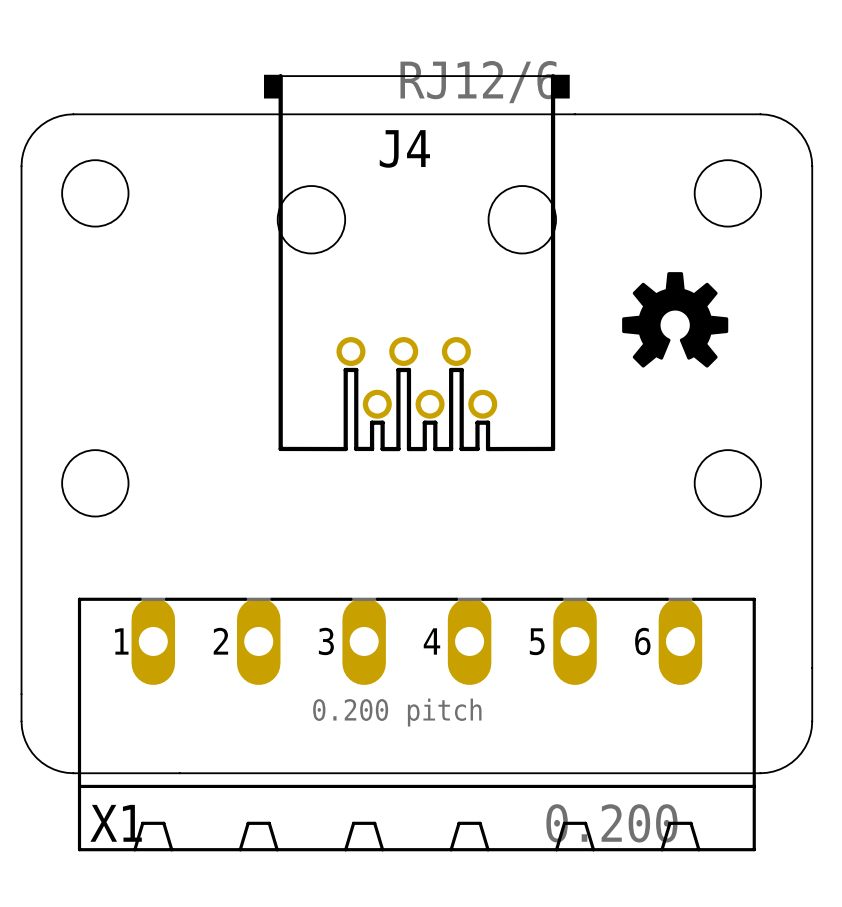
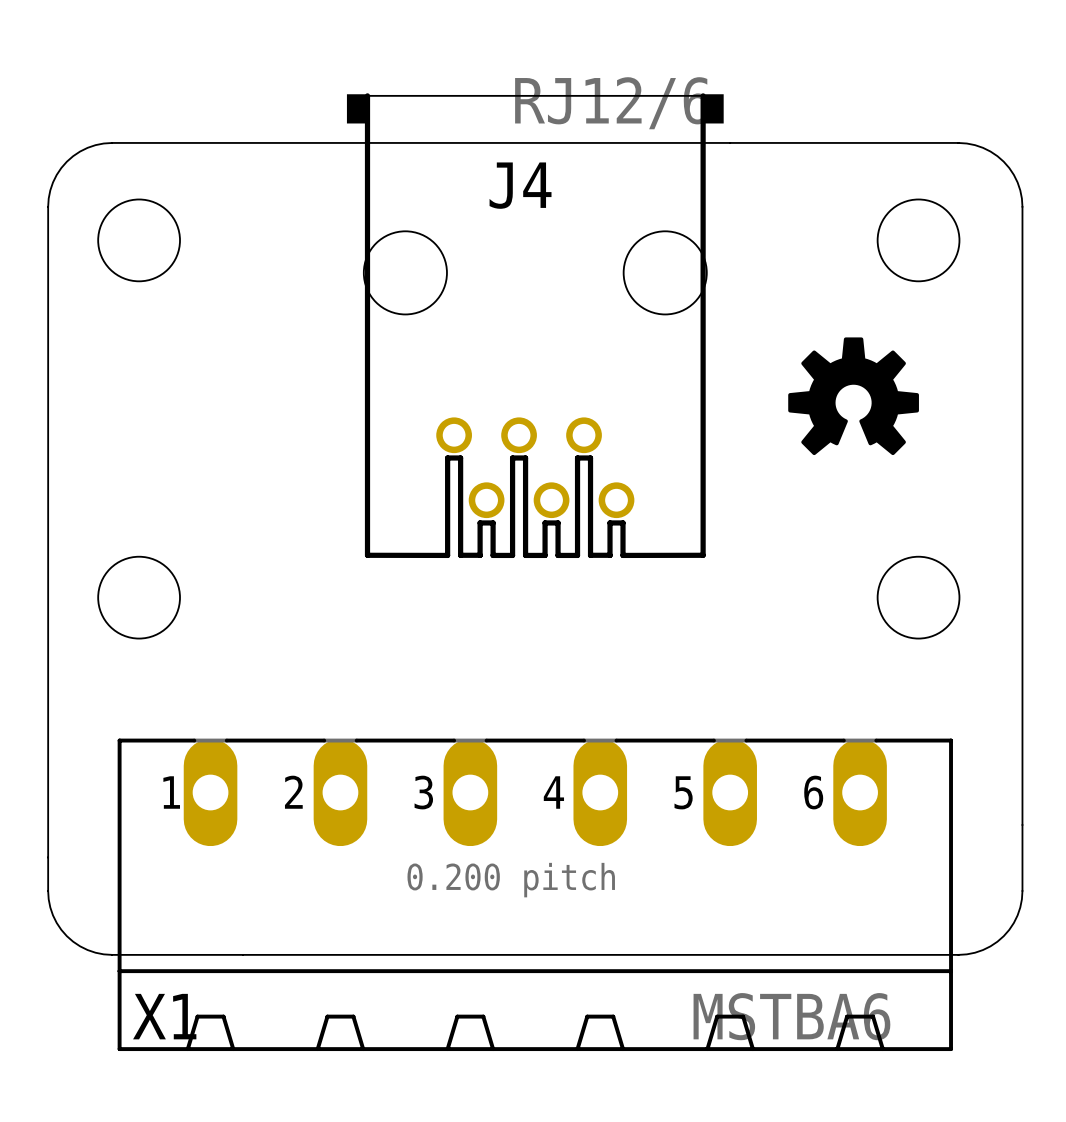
X1 value: 0.200 (611, 823) -> MSTBA6 (791, 1016)

